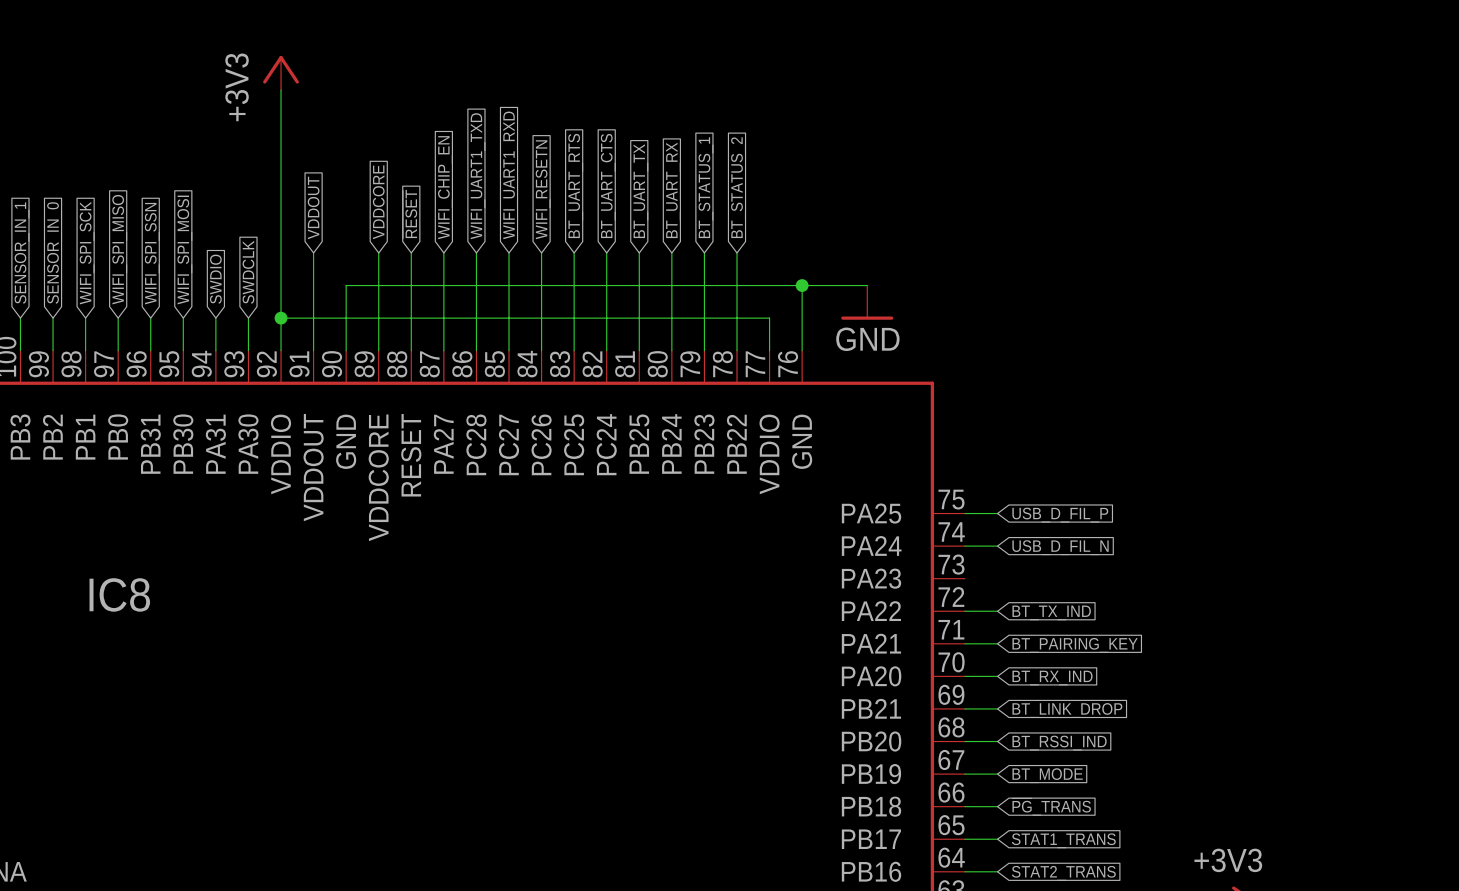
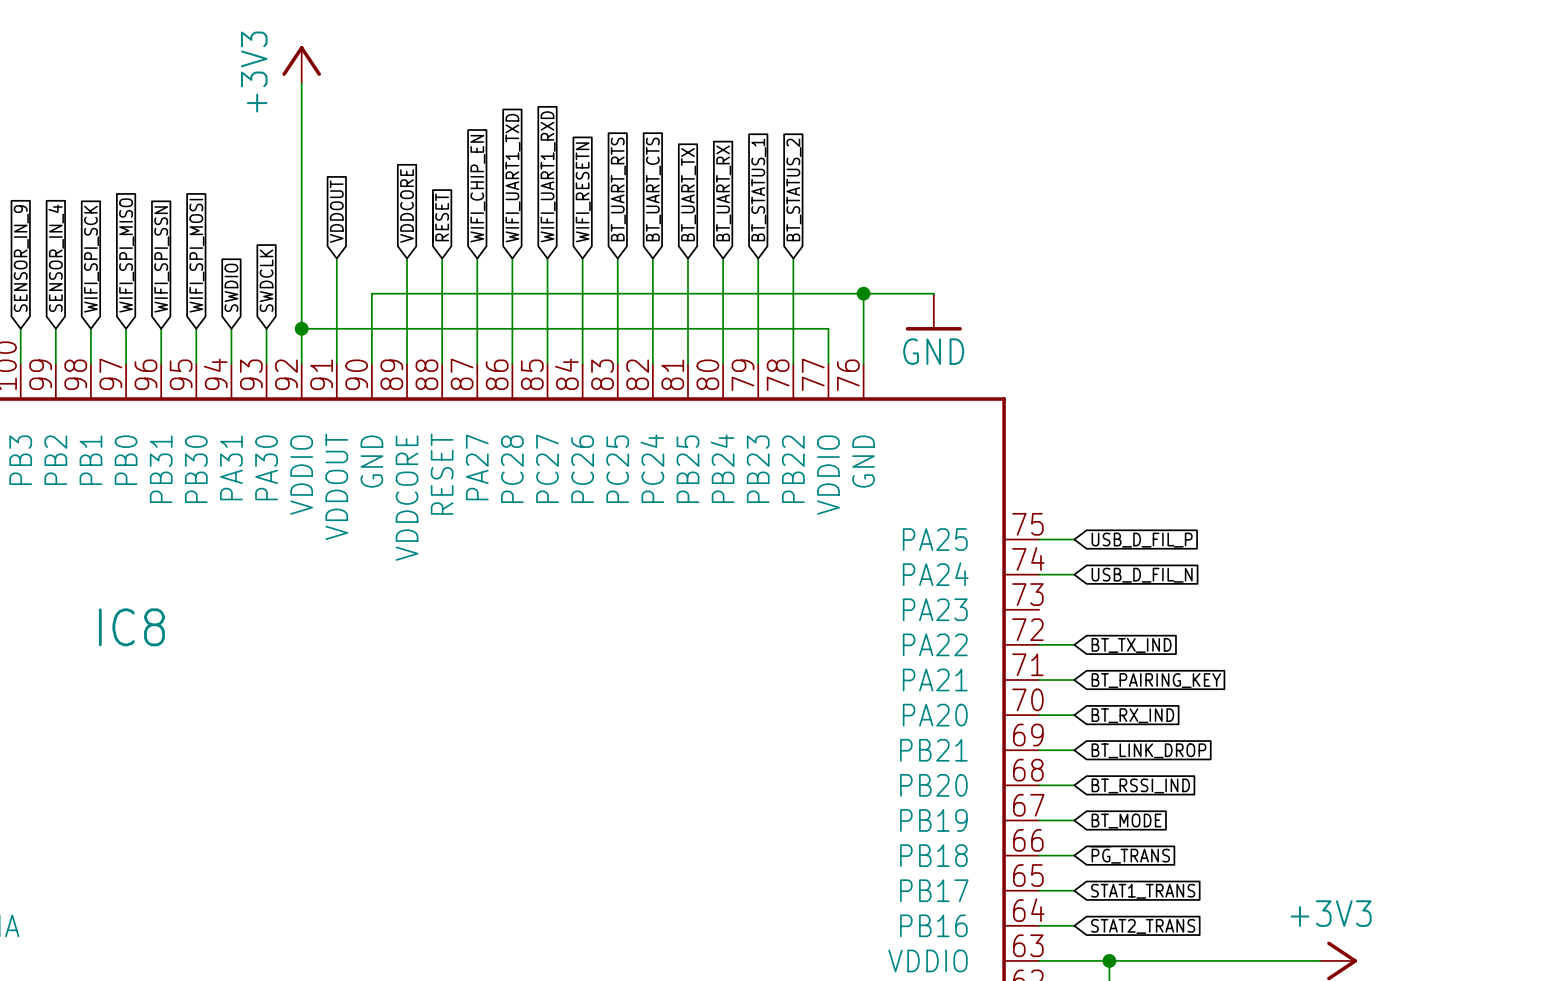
global label: SENSOR_IN_1 (22, 253) -> SENSOR_IN_9 (21, 258)
global label: SENSOR_IN_0 (54, 253) -> SENSOR_IN_4 (56, 258)

